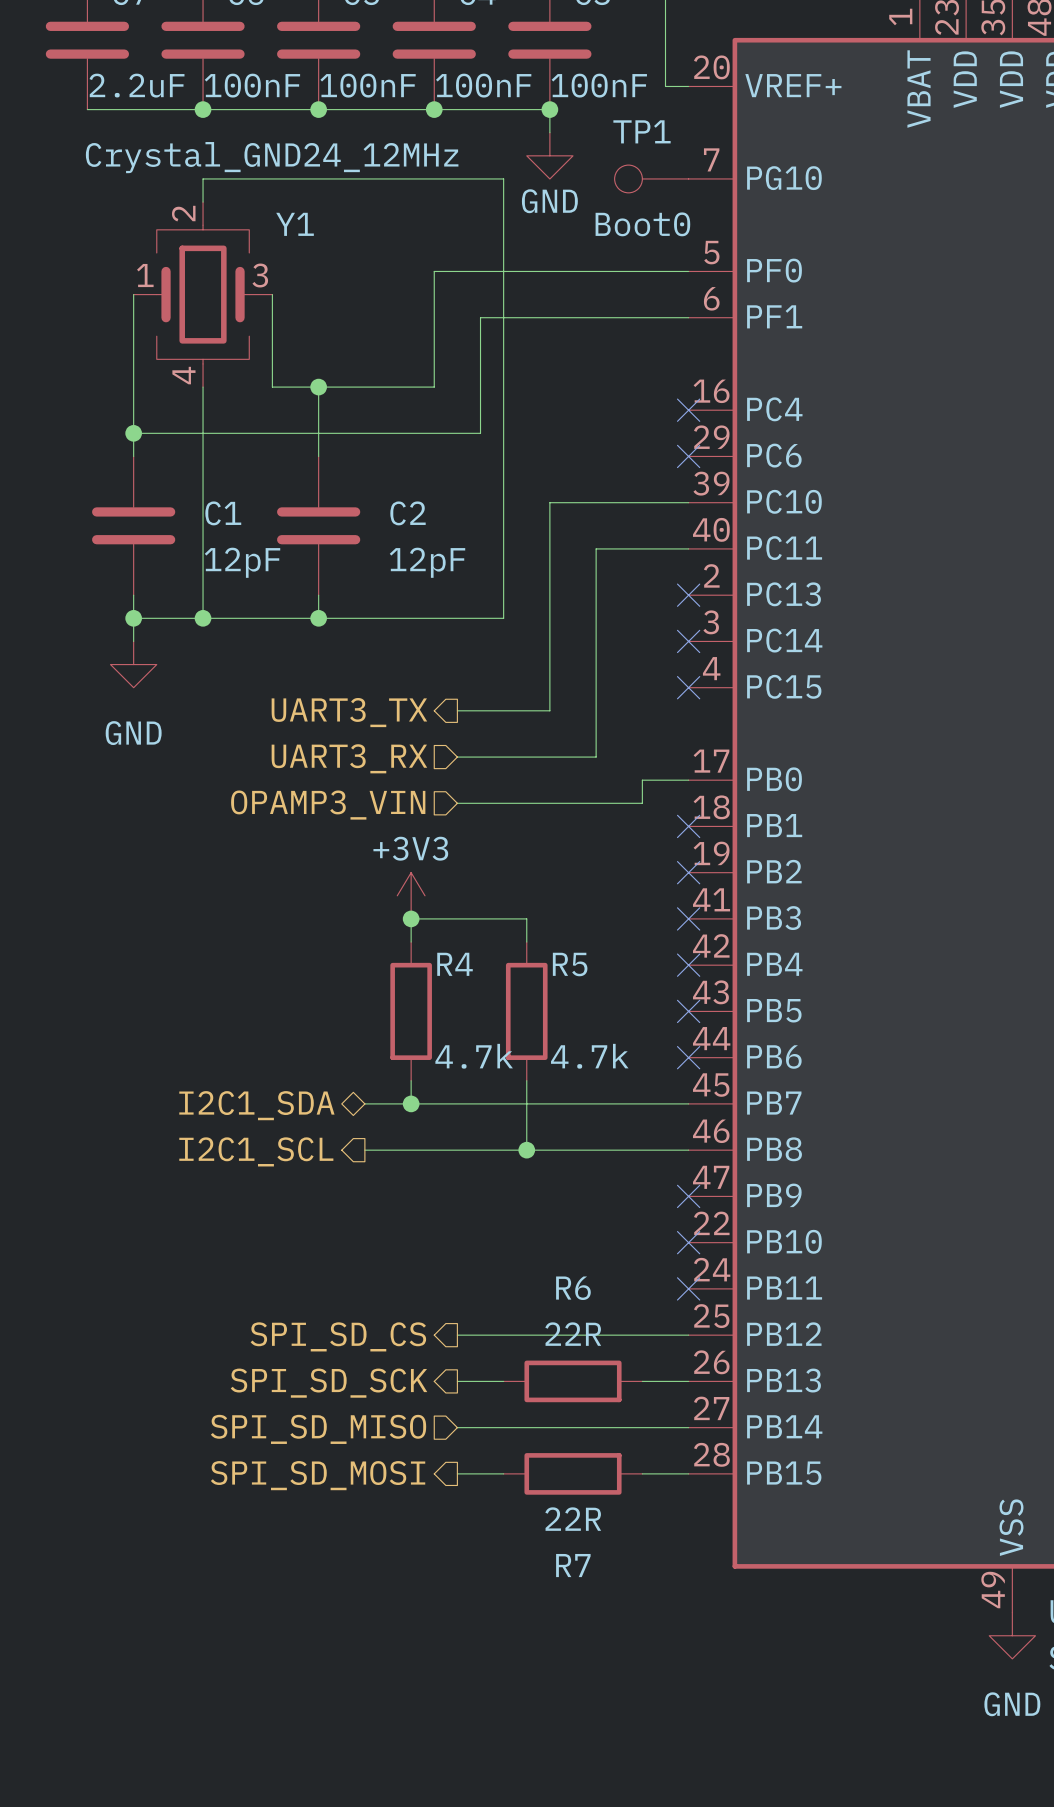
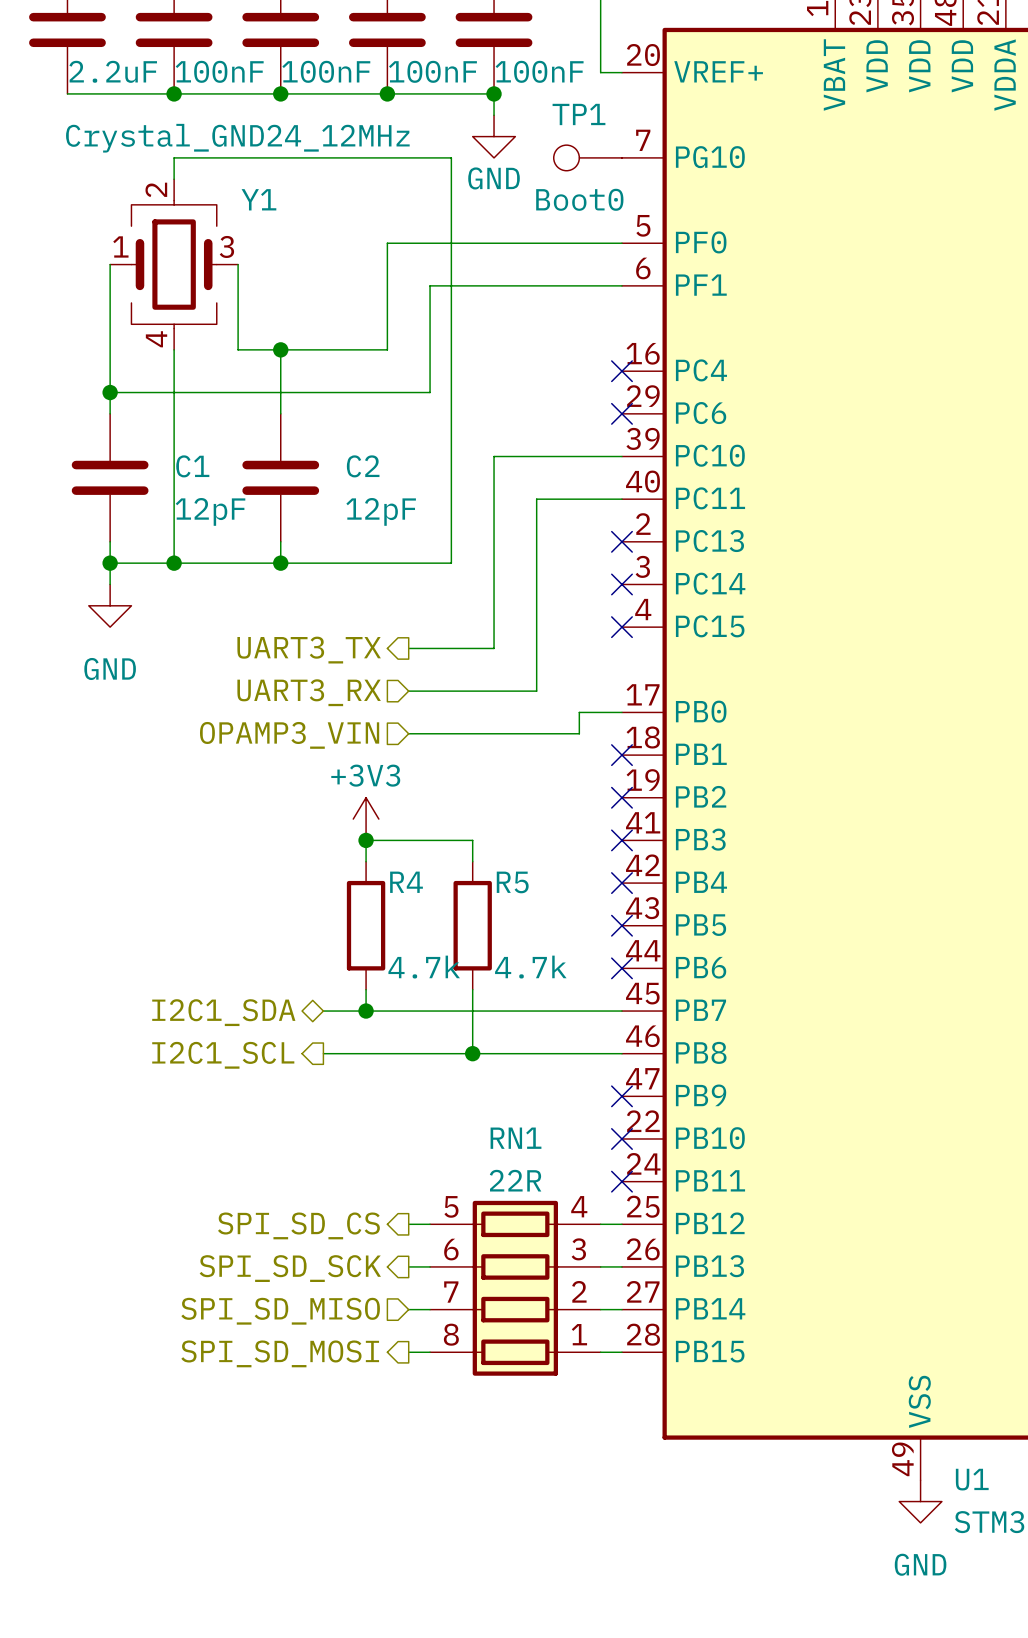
R6: 22R (573, 1381) -> none
RN1: none -> 22R (515, 1288)
R7: 22R (573, 1473) -> none

